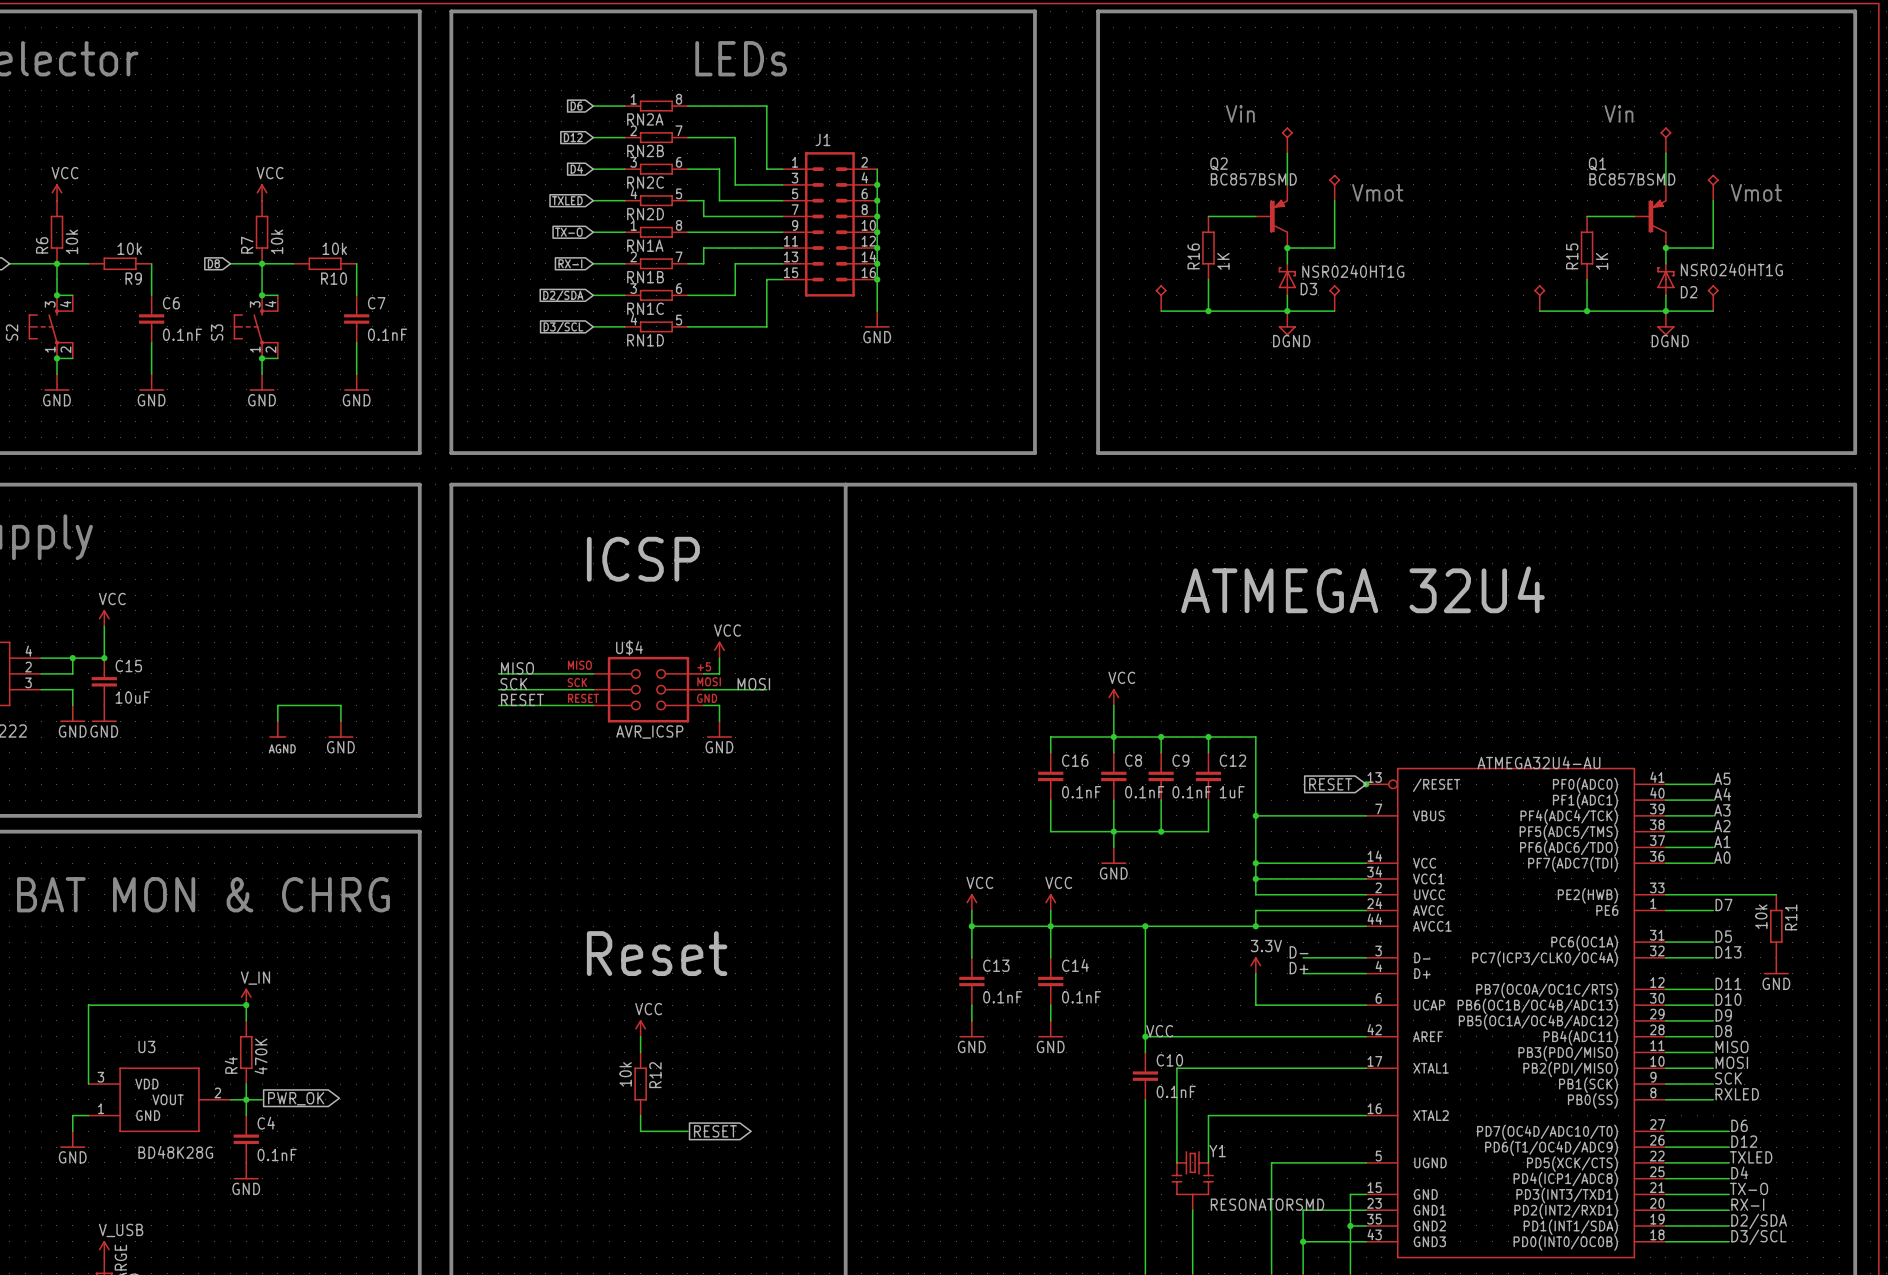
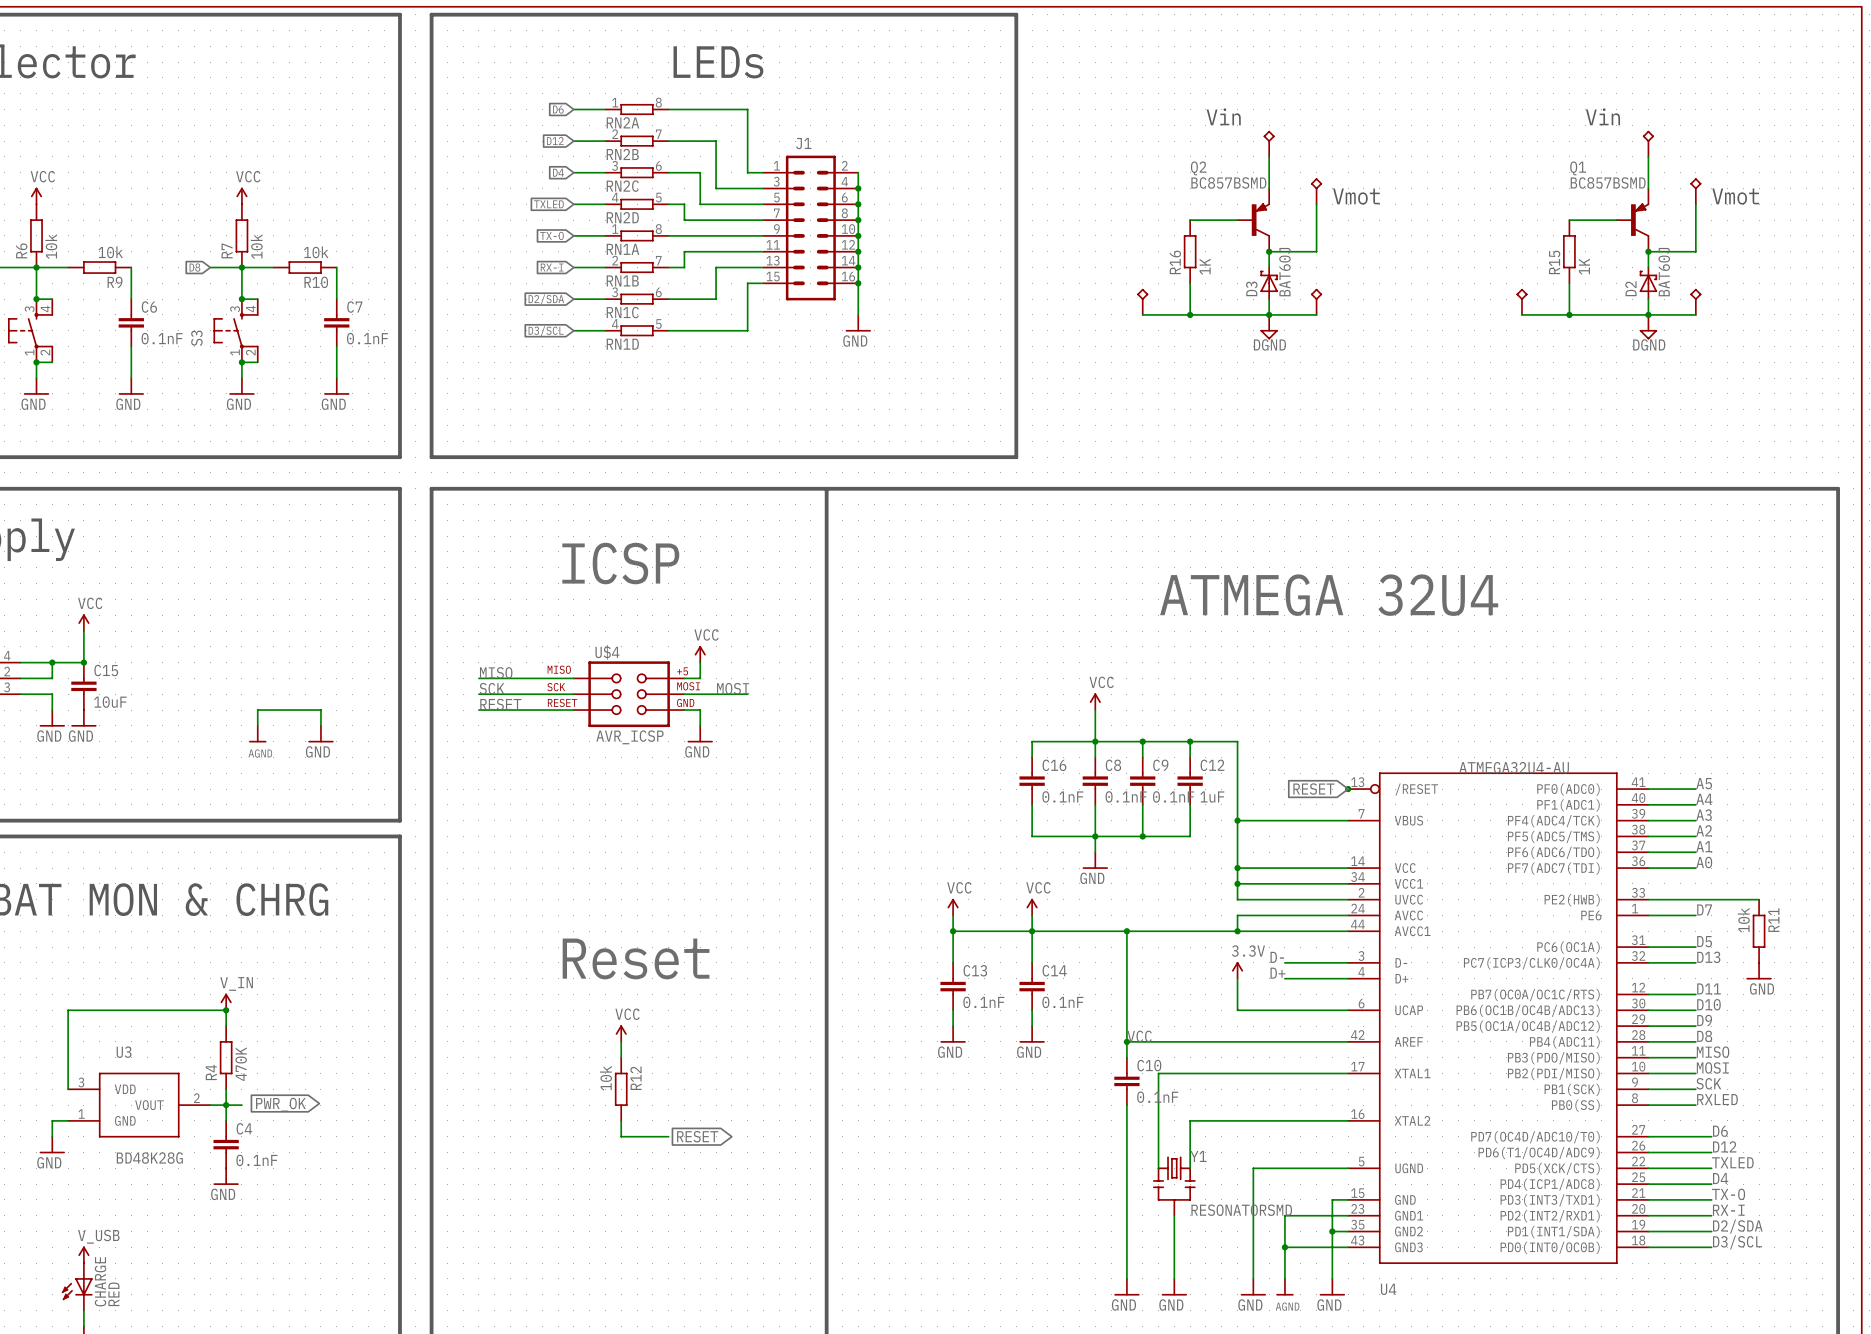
line: (1098, 11) (1855, 11) (1855, 453) (1098, 453) (1098, 11) -> none
D2 value: NSR0240HT1G (1731, 269) -> BAT60J (1664, 272)
D3 value: NSR0240HT1G (1353, 271) -> BAT60J (1284, 272)
D3 name rotation: 0° (1308, 289) -> 90° counterclockwise (1251, 288)
D3 name position: D3 (1308, 289) -> D3 (1251, 288)
D2 name rotation: 0° (1689, 292) -> 90° counterclockwise (1630, 288)
D2 name position: D2 (1689, 292) -> D2 (1630, 288)

